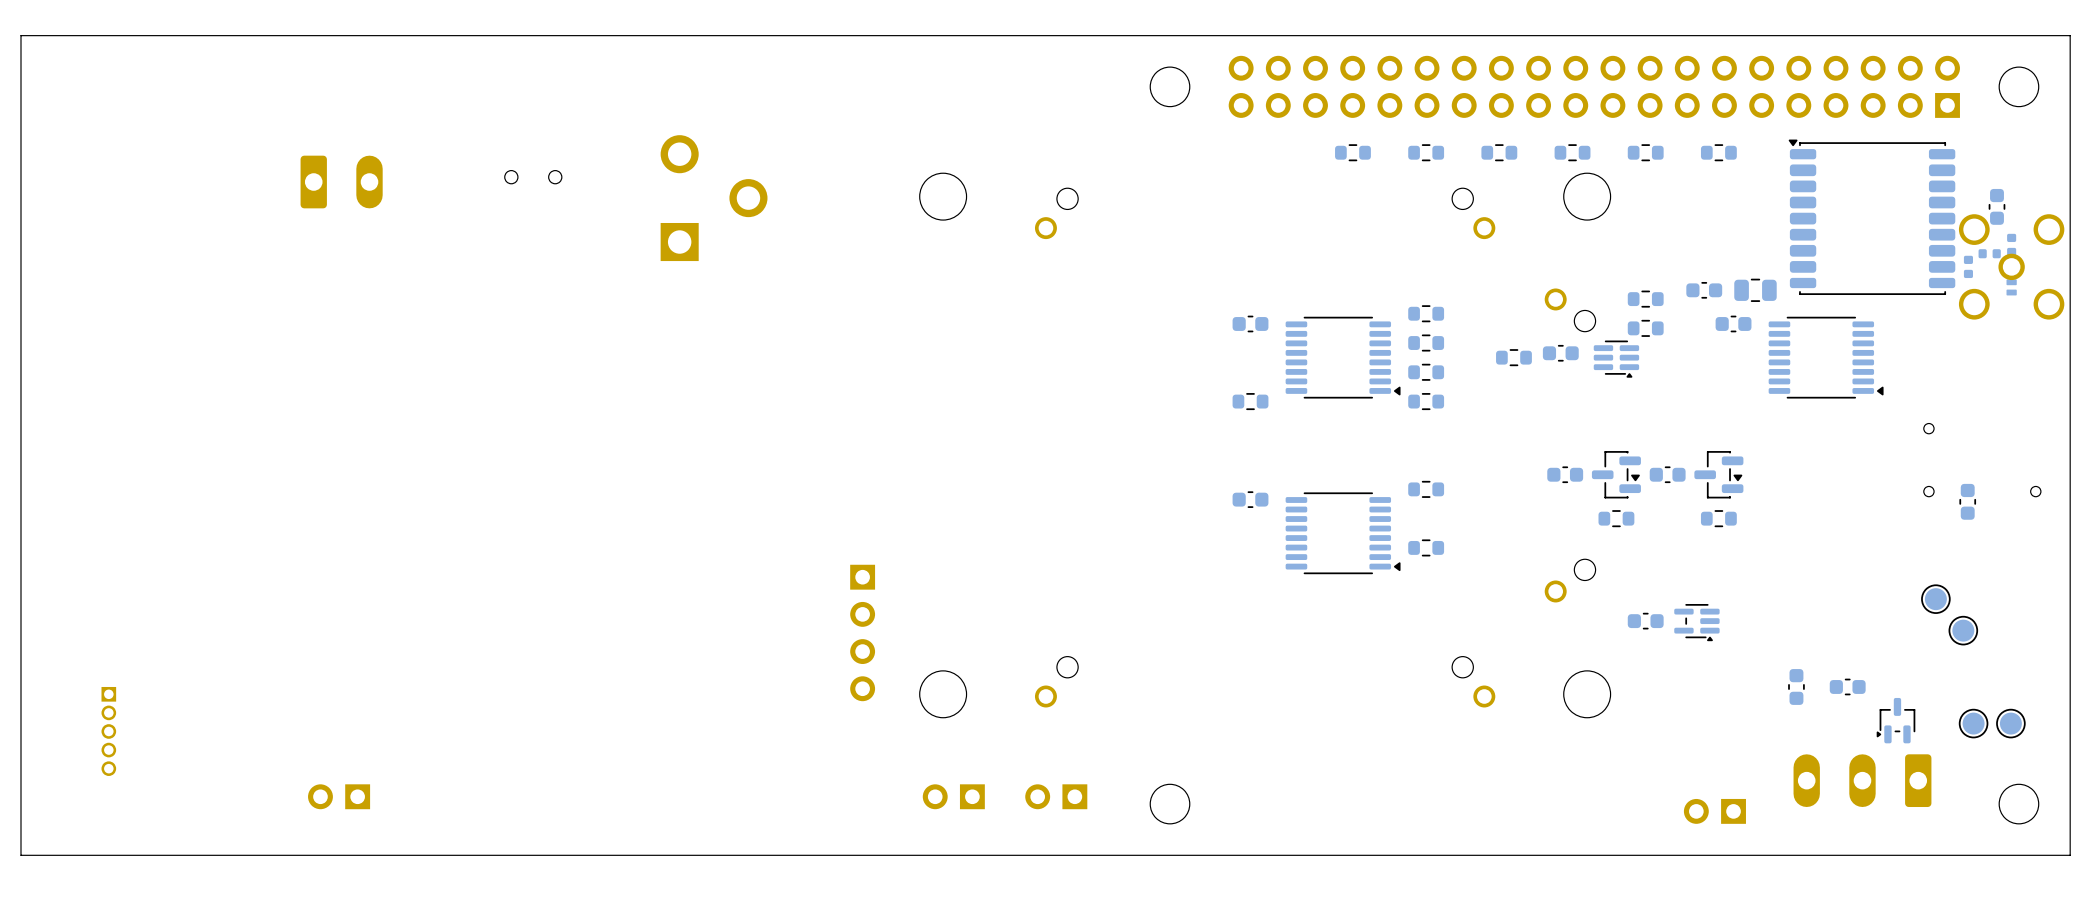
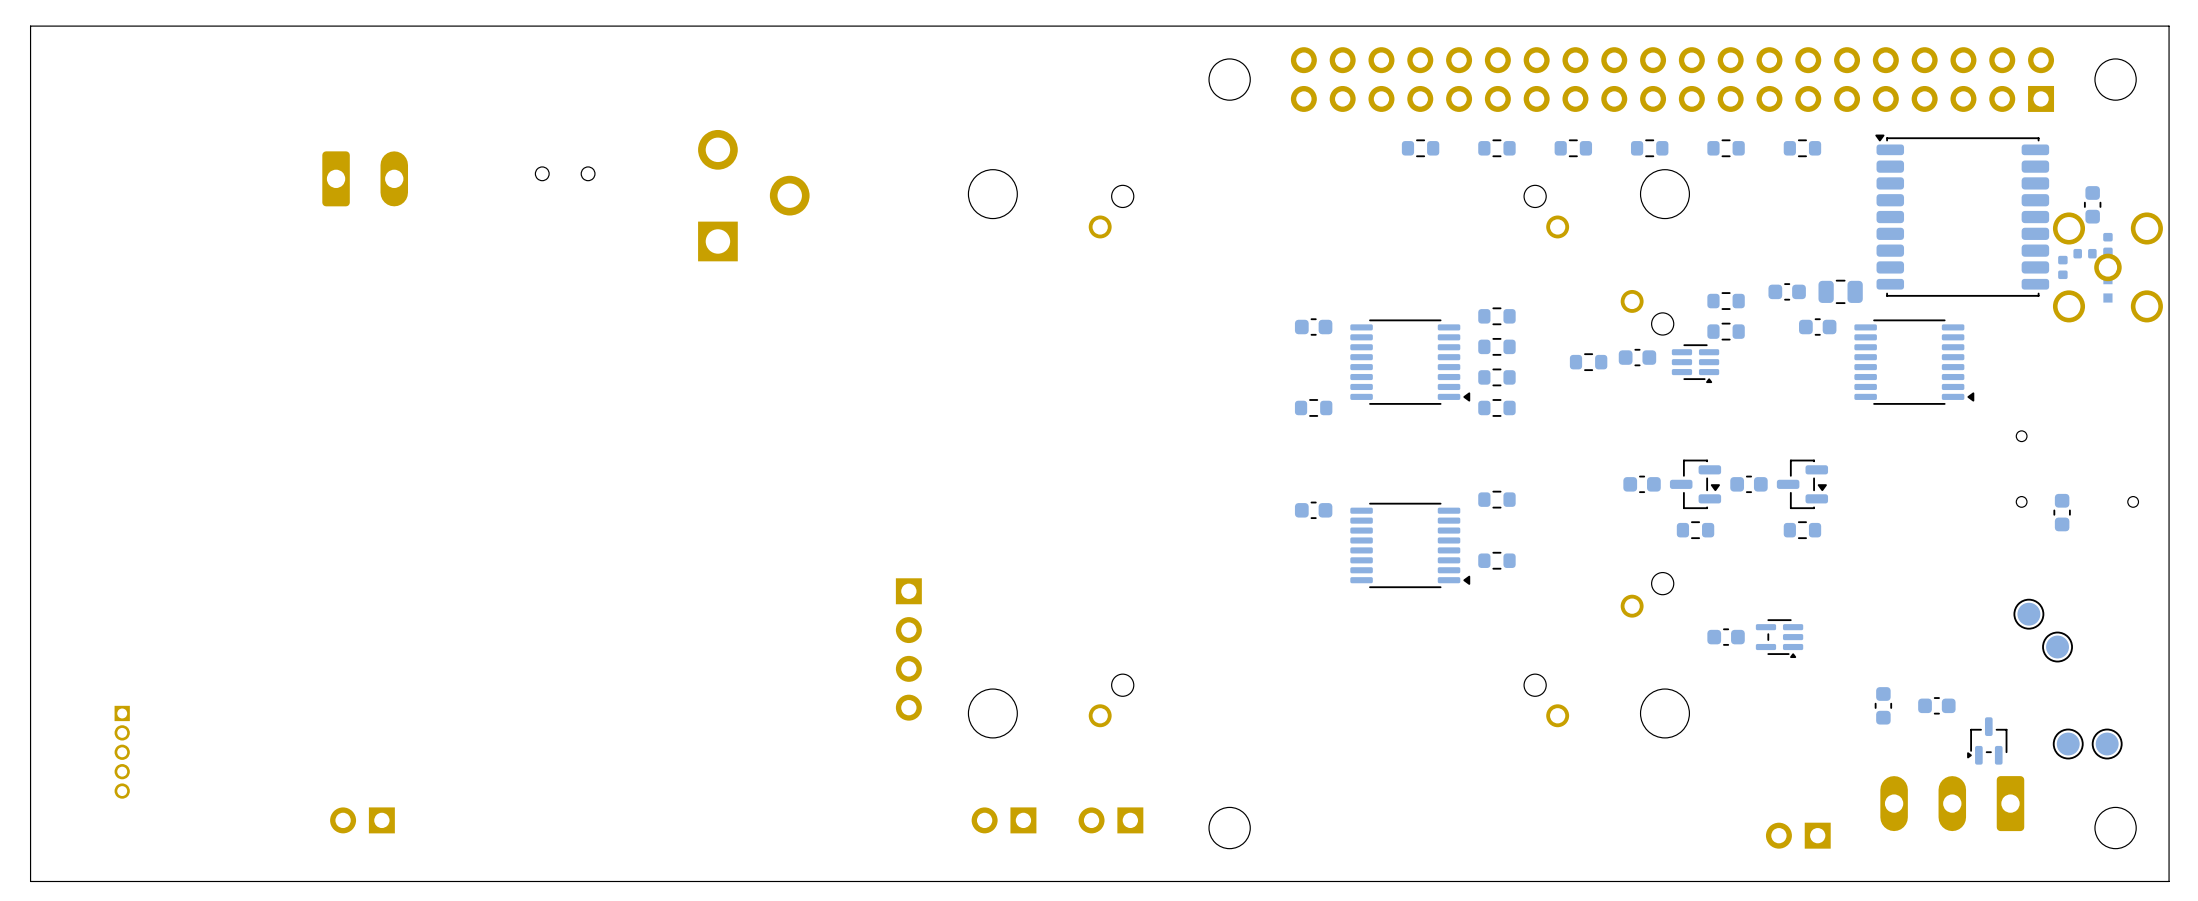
part footprint: [2006, 279, 2017, 296] -> [2103, 275, 2113, 303]

